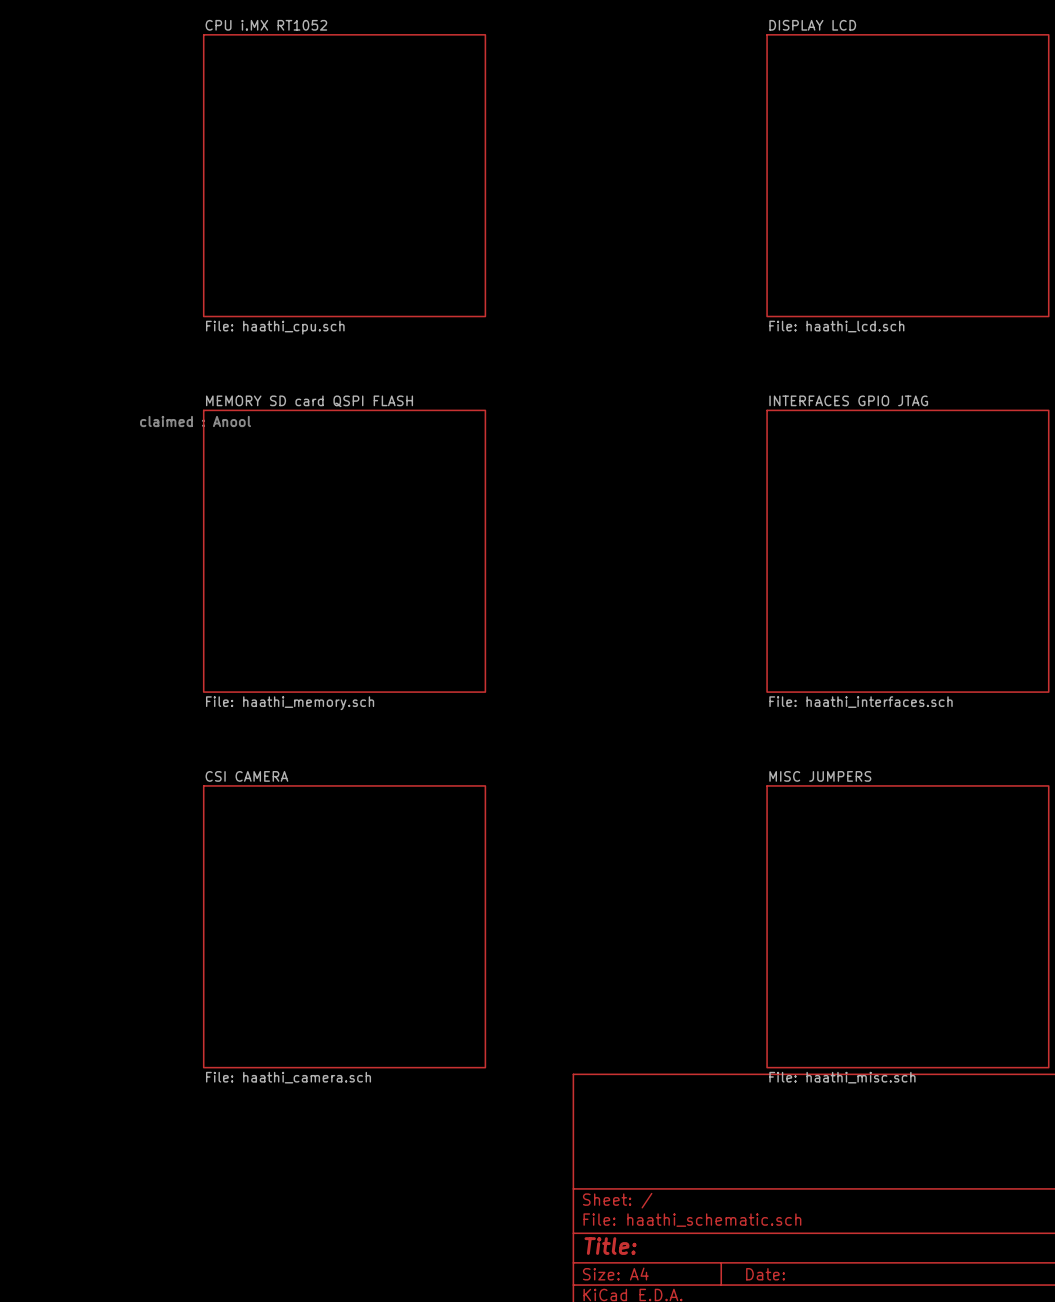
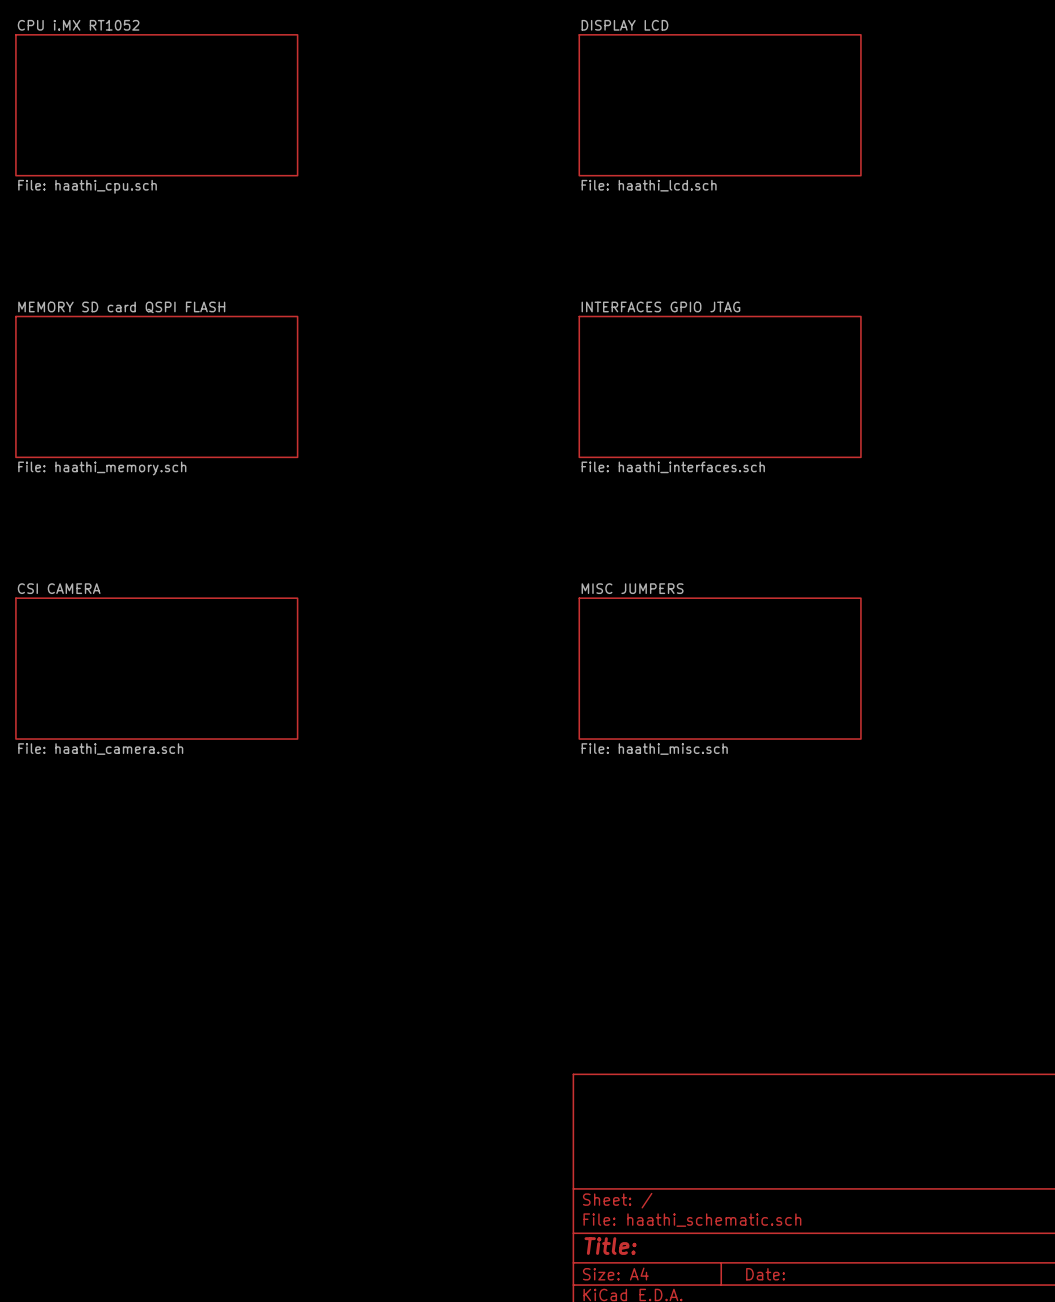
sheet CPU i.MX RT1052 name position: CPU i.MX RT1052 (266, 25) -> CPU i.MX RT1052 (78, 25)
sheet CPU i.MX RT1052 shape: [203, 34, 486, 317] -> [15, 34, 298, 176]
sheet DISPLAY LCD: none -> File: haathi_lcd.sch (720, 105)
sheet DISPLAY LCD: File: haathi_lcd.sch (907, 175) -> none
sheet CPU i.MX RT1052 value position: File: haathi_cpu.sch (275, 327) -> File: haathi_cpu.sch (87, 186)
sheet MEMORY SD card QSPI FLASH: none -> File: haathi_memory.sch (156, 386)
sheet INTERFACES GPIO JTAG: none -> File: haathi_interfaces.sch (720, 386)
text: claimed : Anool (195, 421) -> none
sheet MEMORY SD card QSPI FLASH: File: haathi_memory.sch (344, 551) -> none
sheet INTERFACES GPIO JTAG: File: haathi_interfaces.sch (907, 551) -> none
sheet CSI CAMERA: none -> File: haathi_camera.sch (156, 668)
sheet MISC JUMPERS: none -> File: haathi_misc.sch (720, 668)
sheet CSI CAMERA: File: haathi_camera.sch (344, 926) -> none
sheet MISC JUMPERS: File: haathi_misc.sch (907, 926) -> none

